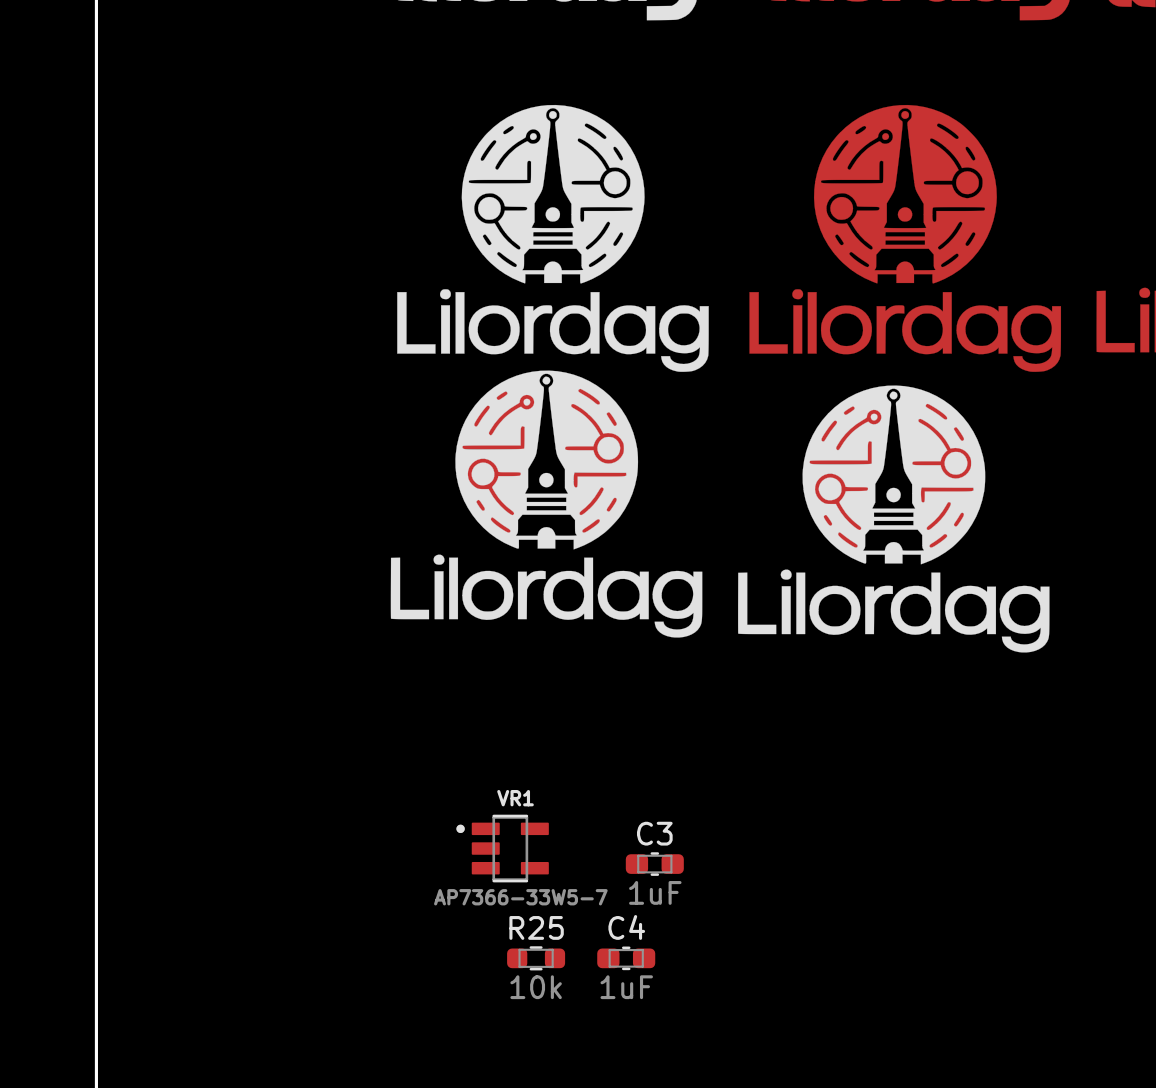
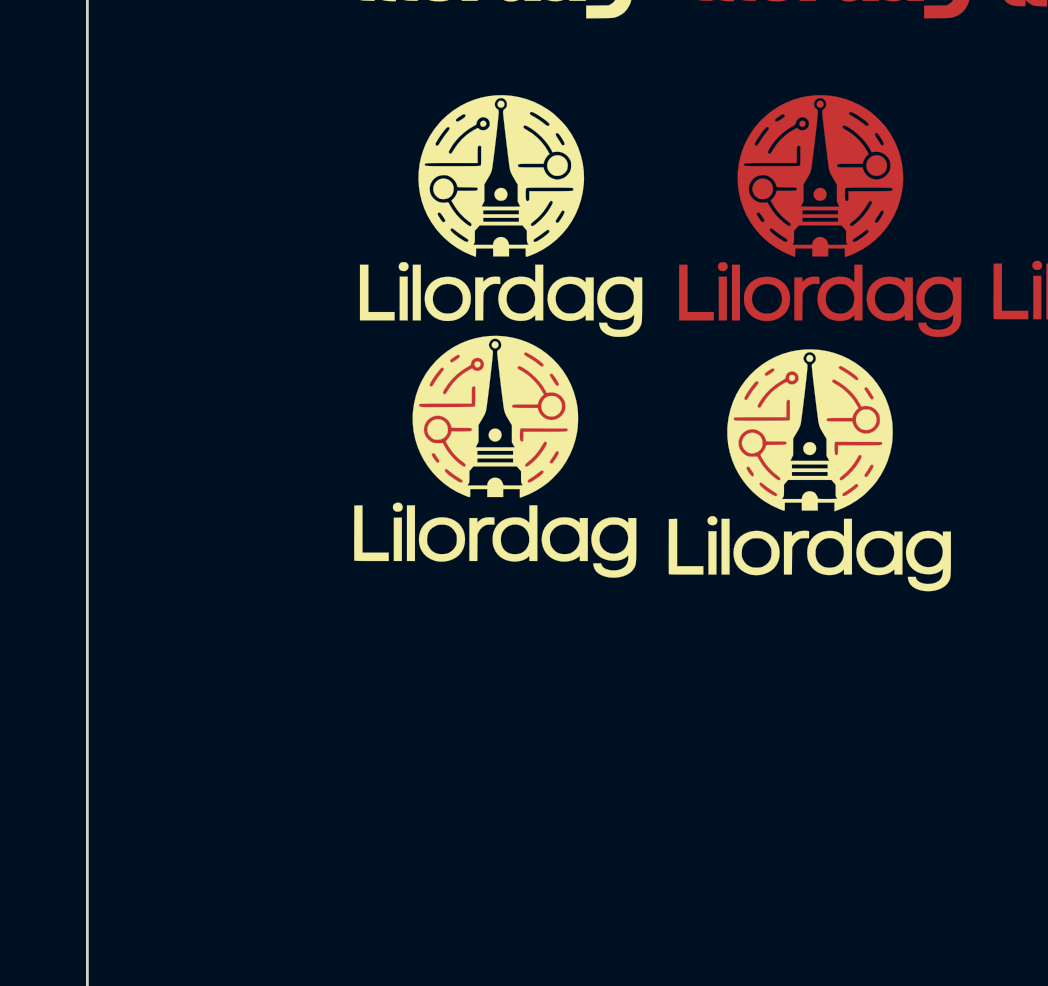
VR1: AP7366-33W5-7 (502, 848) -> none
C3: 1uF (654, 864) -> none
R25: 10k (536, 958) -> none
C4: 1uF (626, 958) -> none

